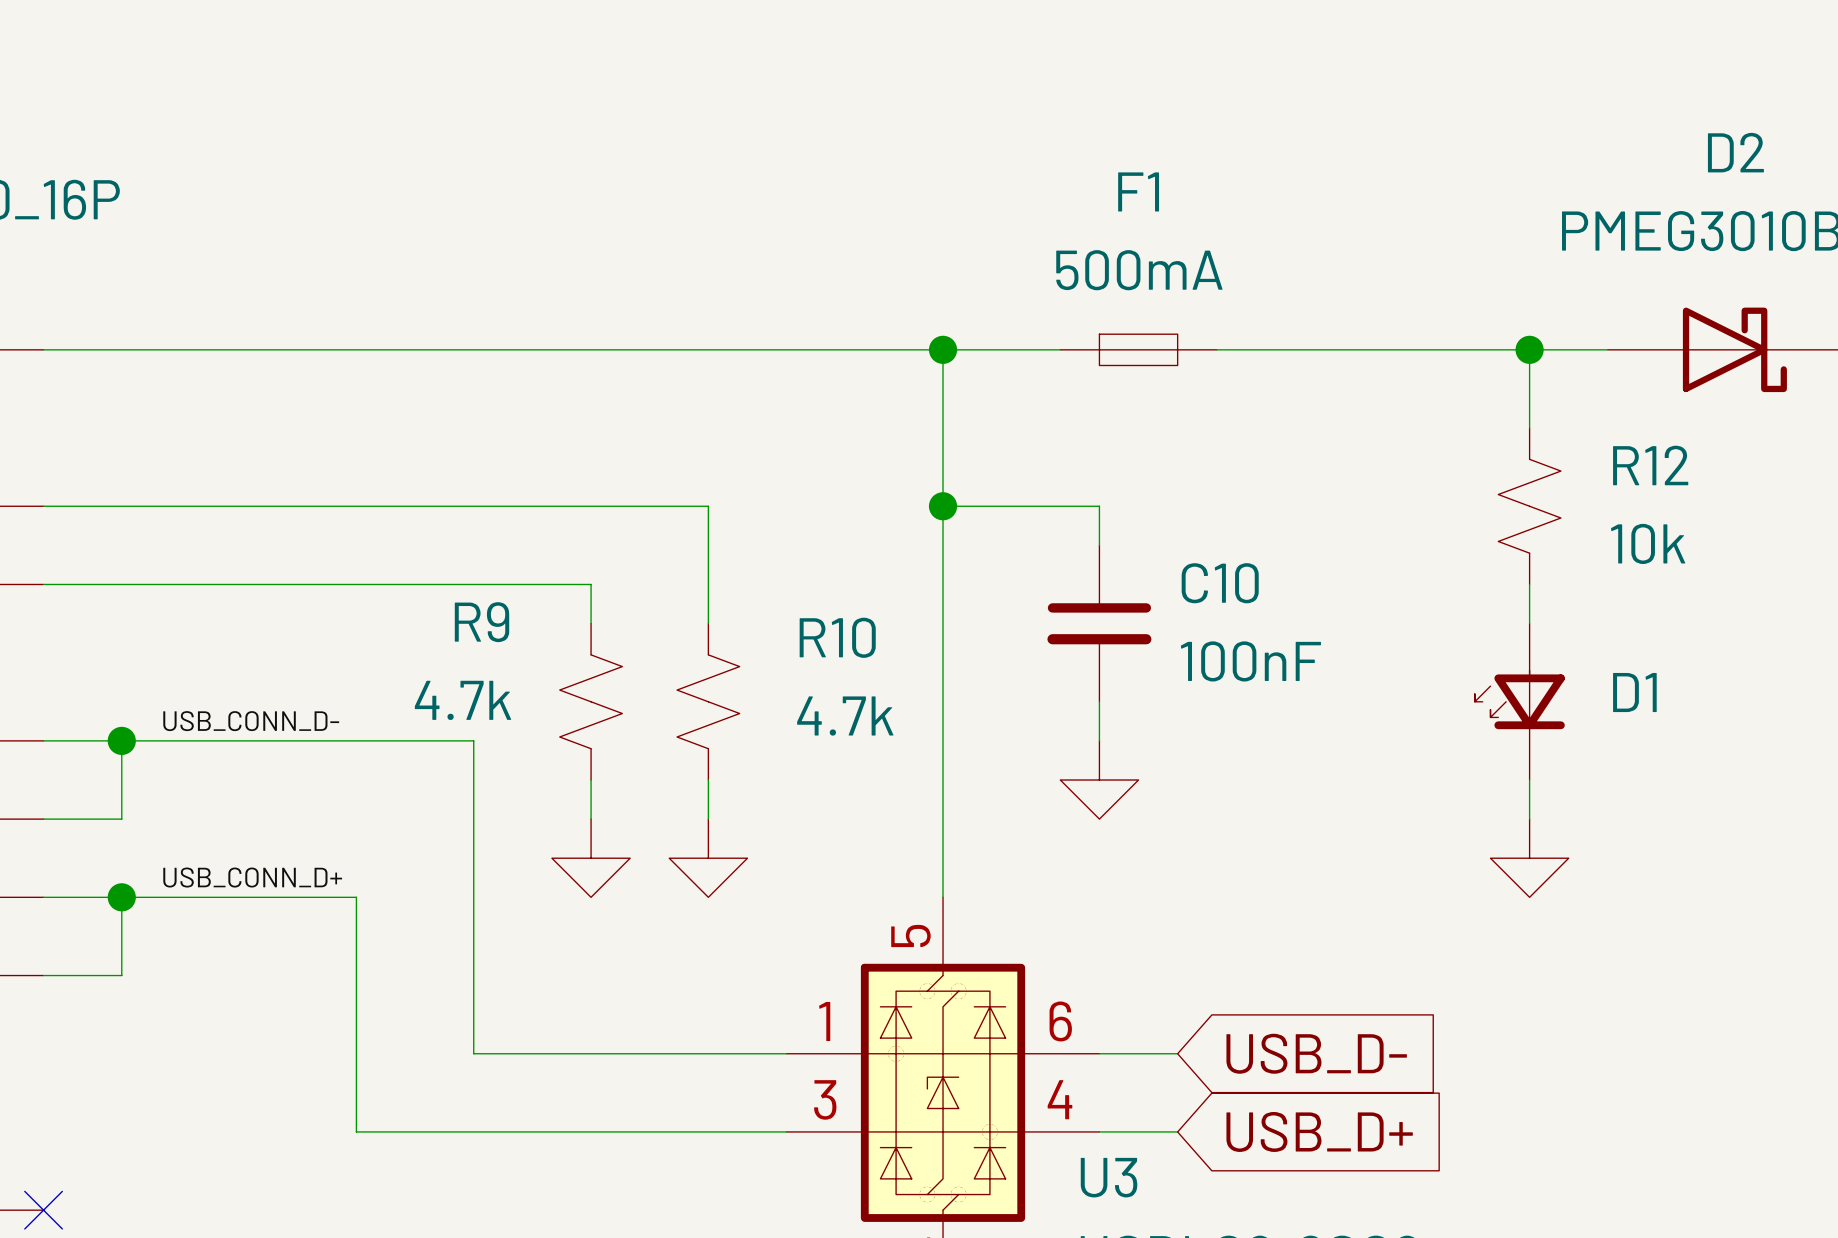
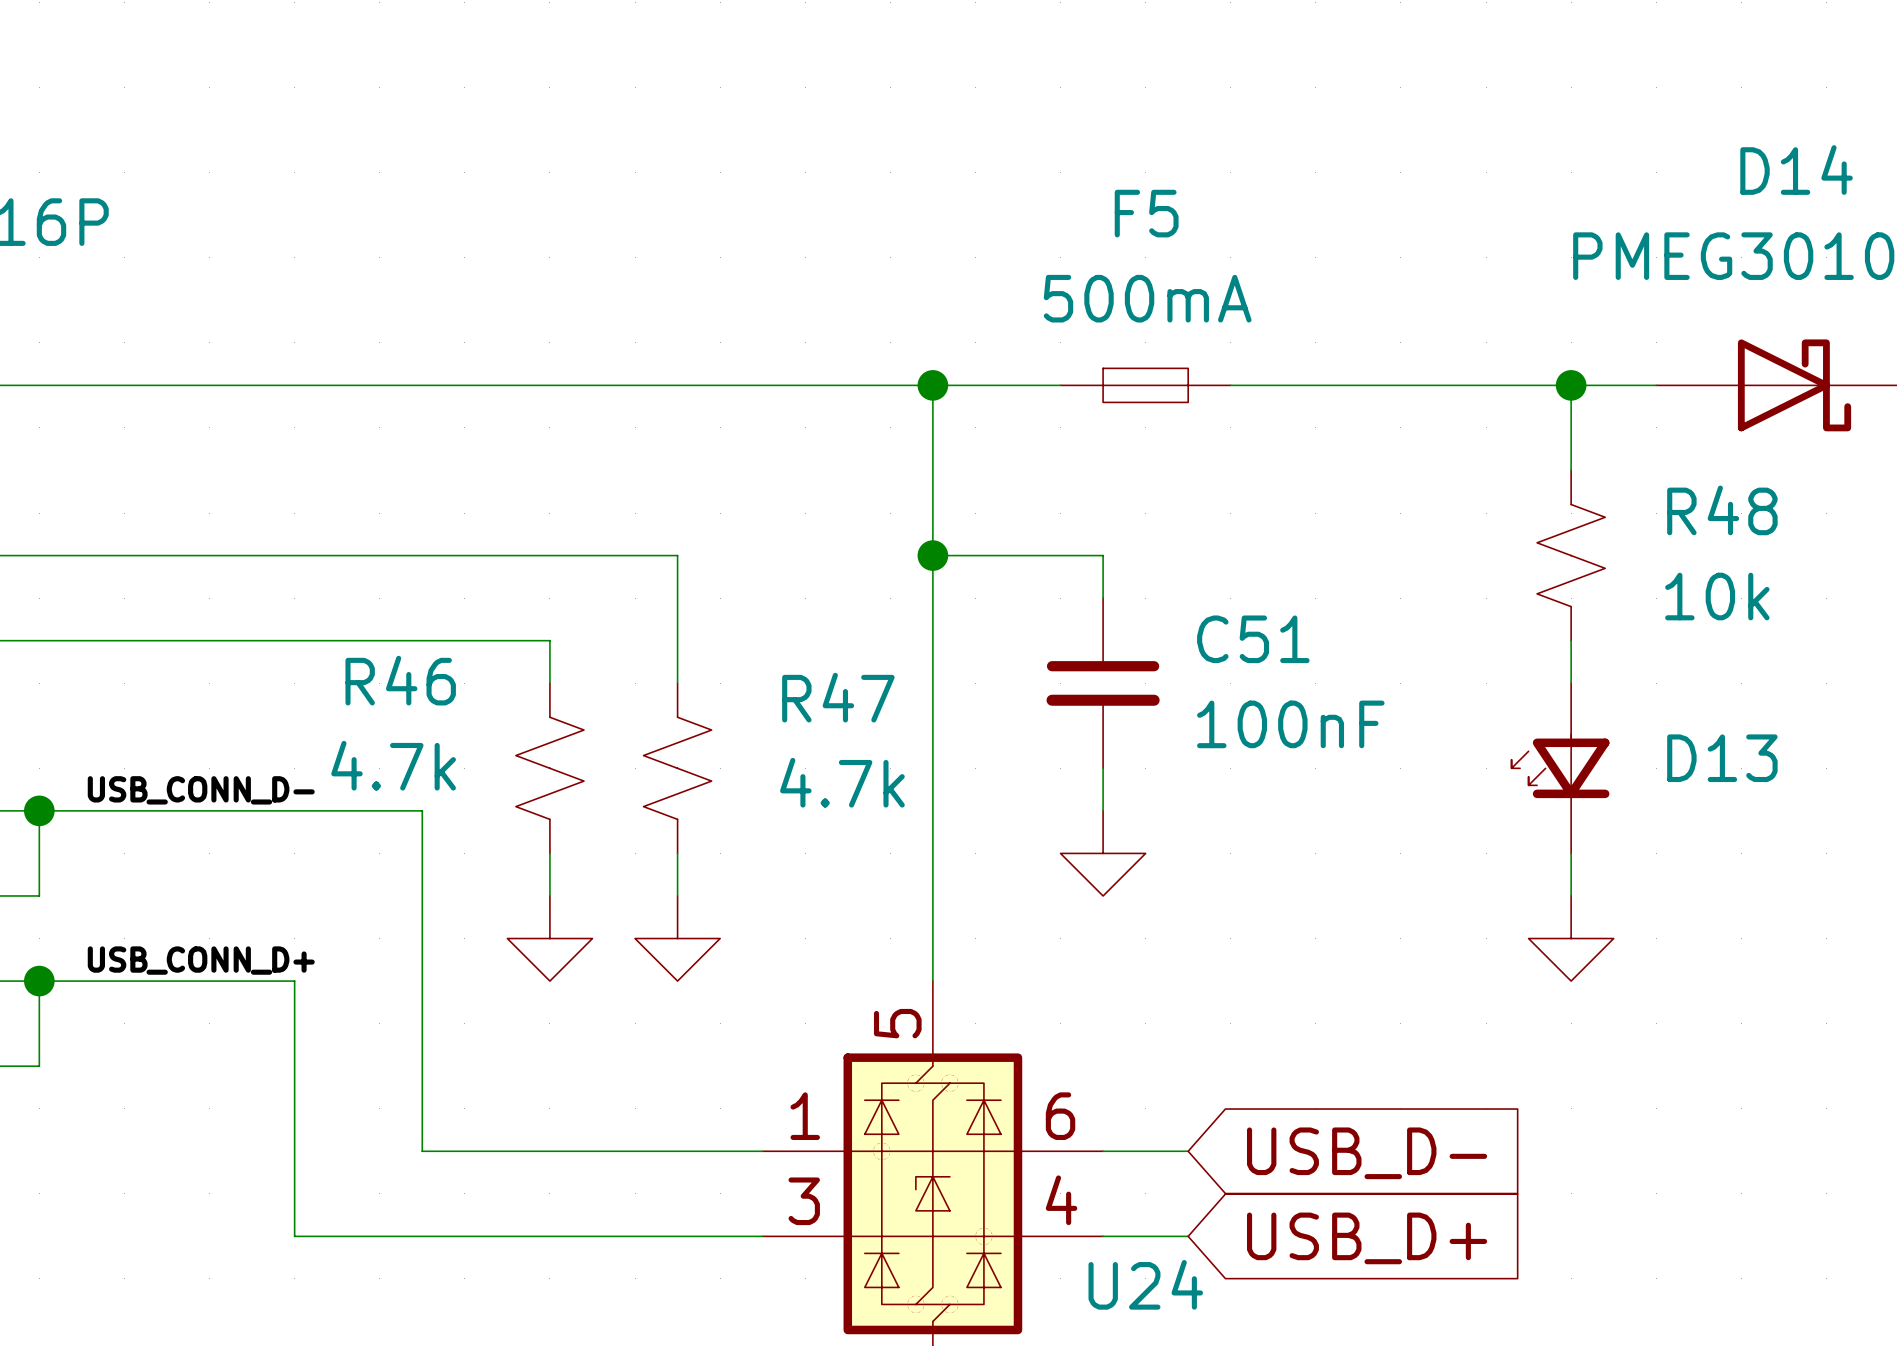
D2 name: D2 (1735, 152) -> D14 (1796, 170)
F1 name: F1 (1138, 191) -> F5 (1146, 213)
R12 name: R12 (1650, 465) -> R48 (1722, 510)
C10 name: C10 (1220, 583) -> C51 (1253, 639)
R9 name: R9 (482, 622) -> R46 (400, 680)
R10 name: R10 (837, 637) -> R47 (838, 697)
D1 name: D1 (1634, 692) -> D13 (1722, 758)
U3 name: U3 (1109, 1177) -> U24 (1145, 1284)

